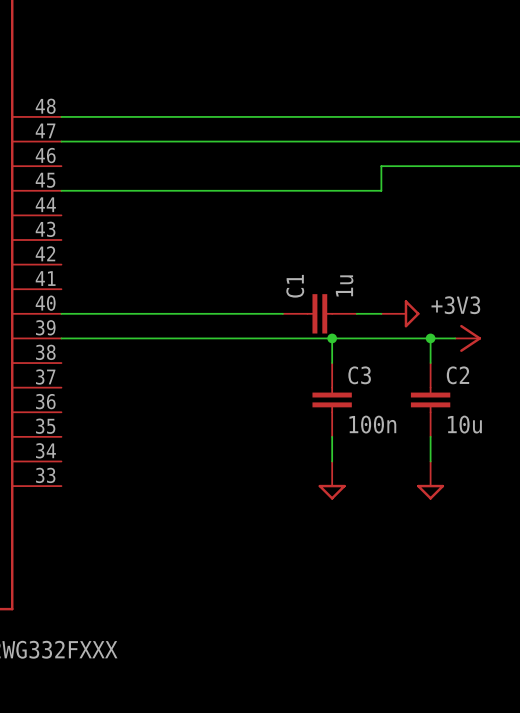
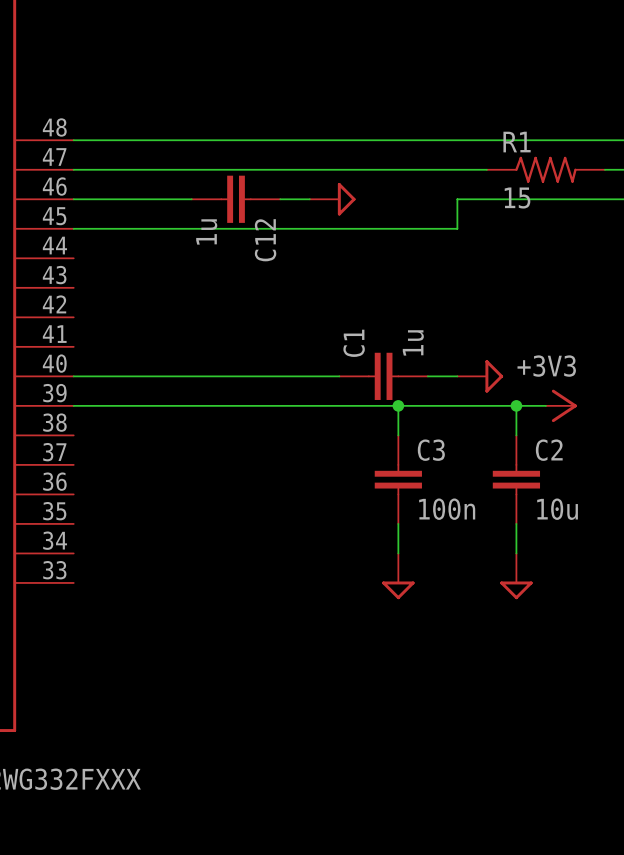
R1: none -> 15 (545, 169)
wire: none -> (73, 199) (191, 199)
C12: none -> 1u (236, 199)
wire: none -> (280, 199) (309, 199)
power symbol: none -> (332, 199)

